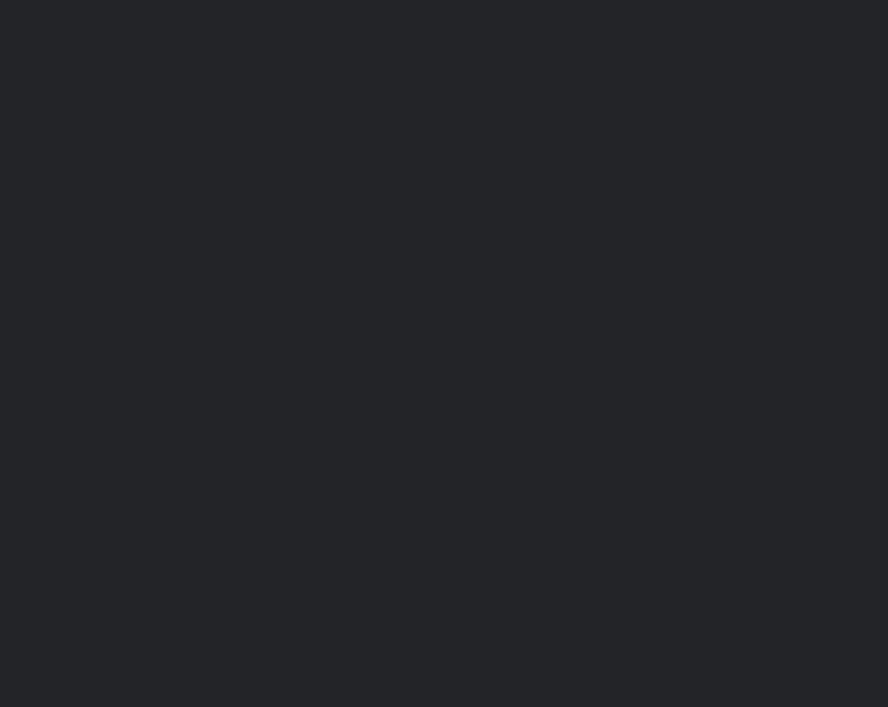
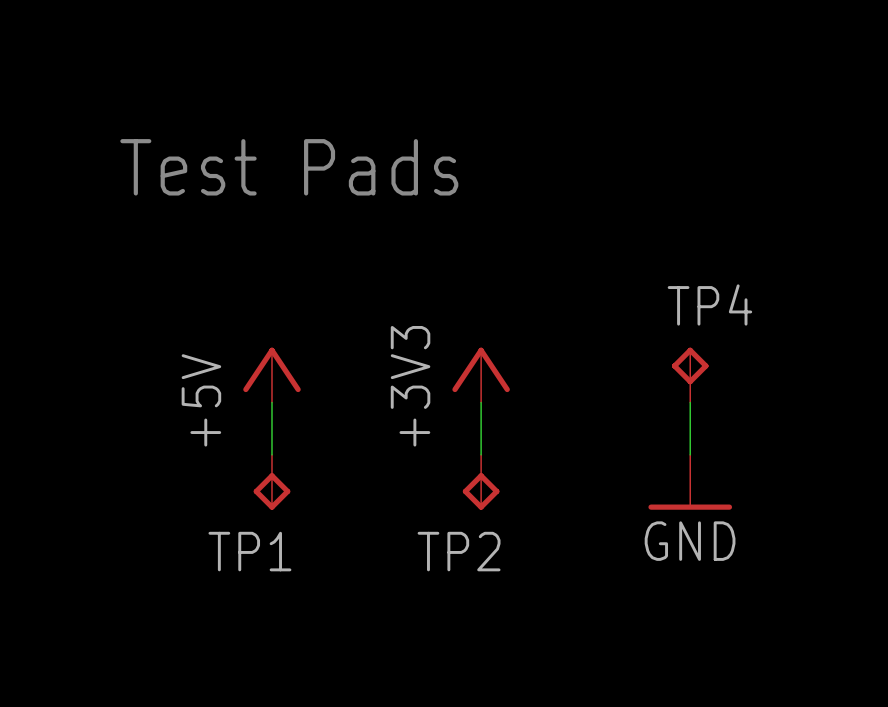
text: none -> Test Pads (289, 167)
power symbol: none -> +5V (271, 375)
power symbol: none -> +3V3 (481, 375)
TP4: none -> (690, 375)
wire: none -> (271, 402) (271, 454)
wire: none -> (481, 402) (481, 454)
wire: none -> (690, 402) (690, 454)
TP1: none -> (271, 482)
TP2: none -> (481, 482)
power symbol: none -> GND (690, 482)

